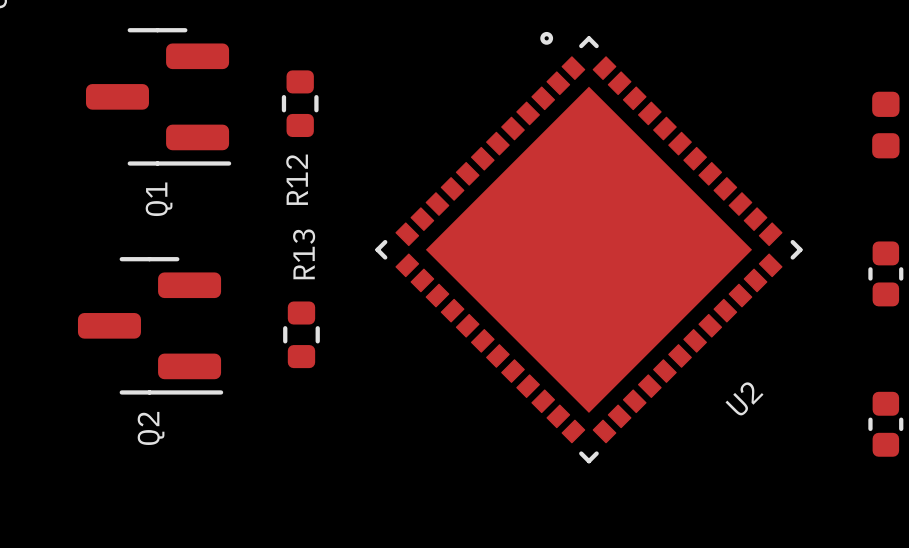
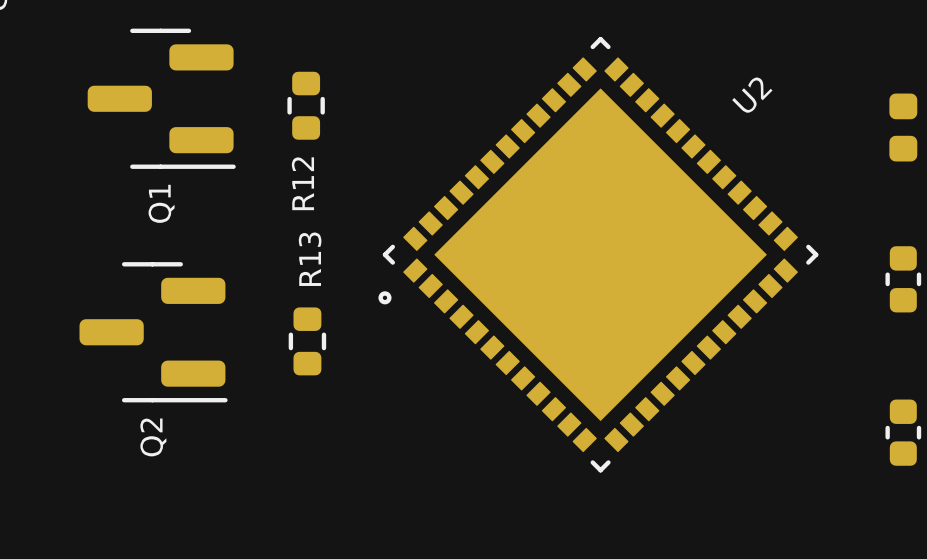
U2 rotation: 0° (588, 247) -> 90° counterclockwise (598, 254)

